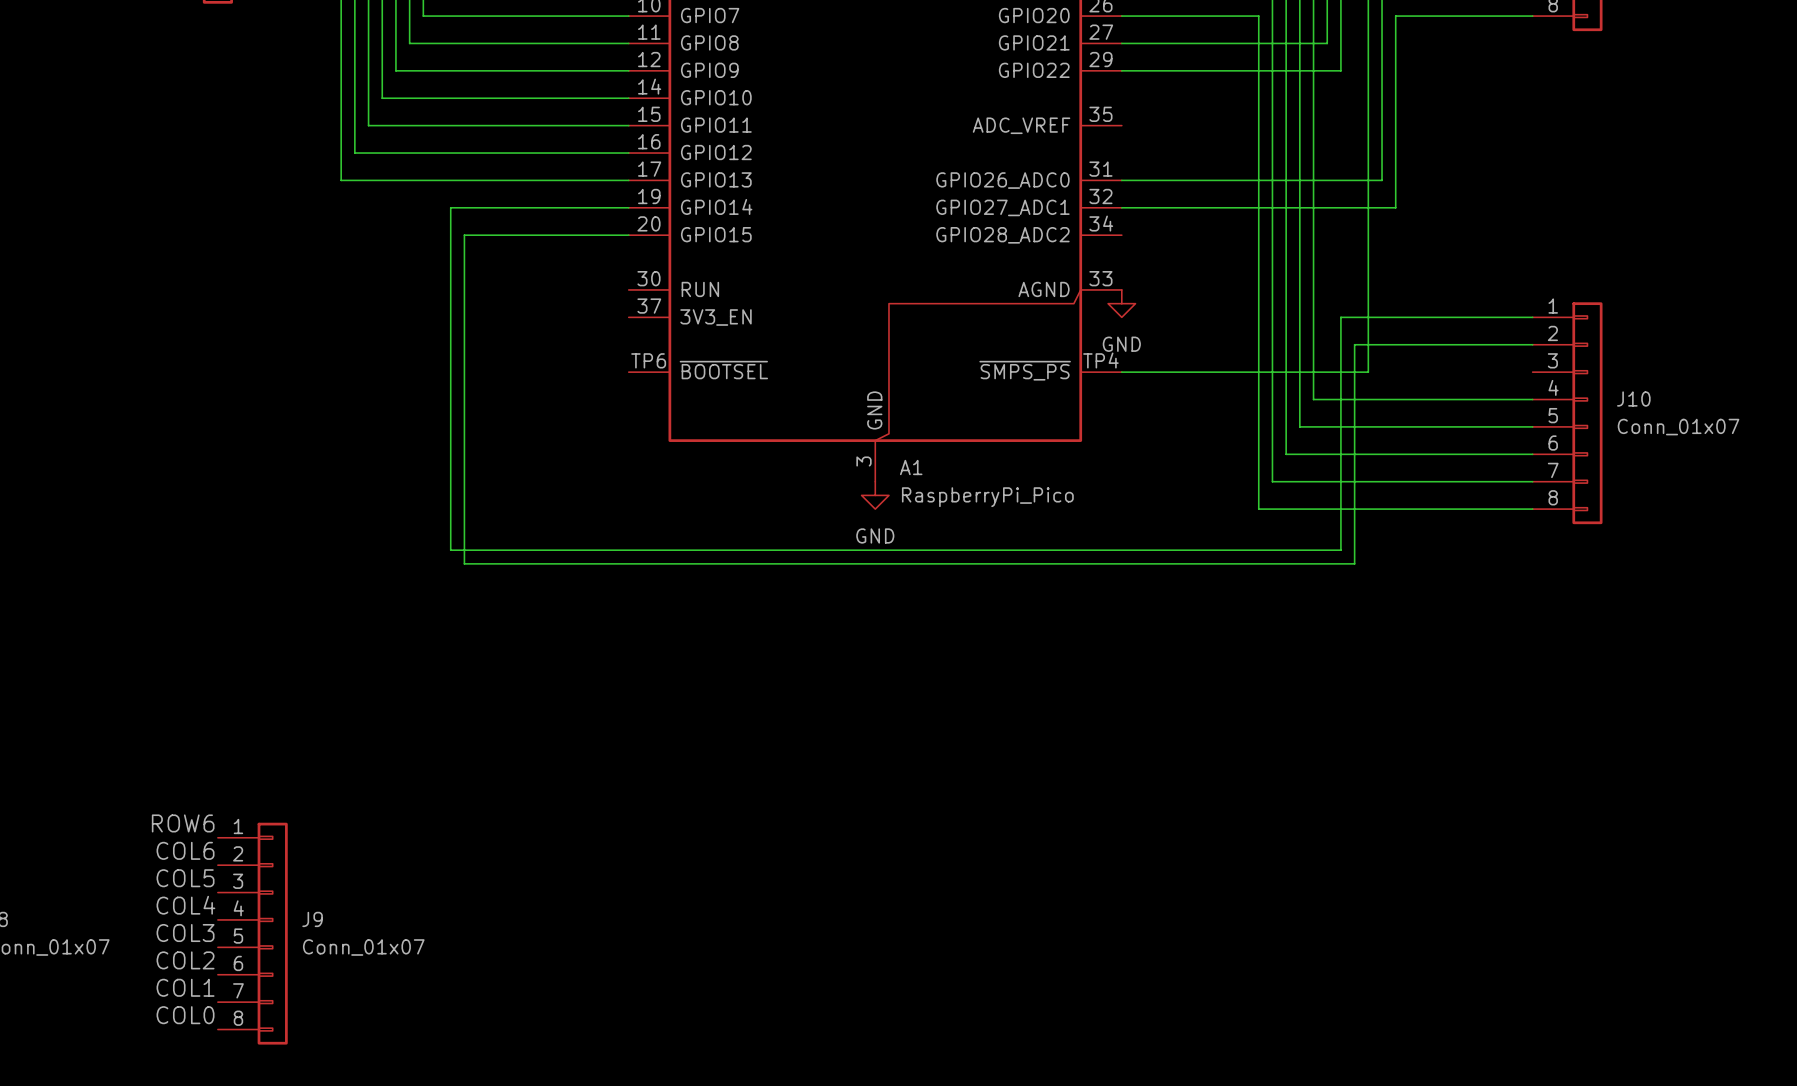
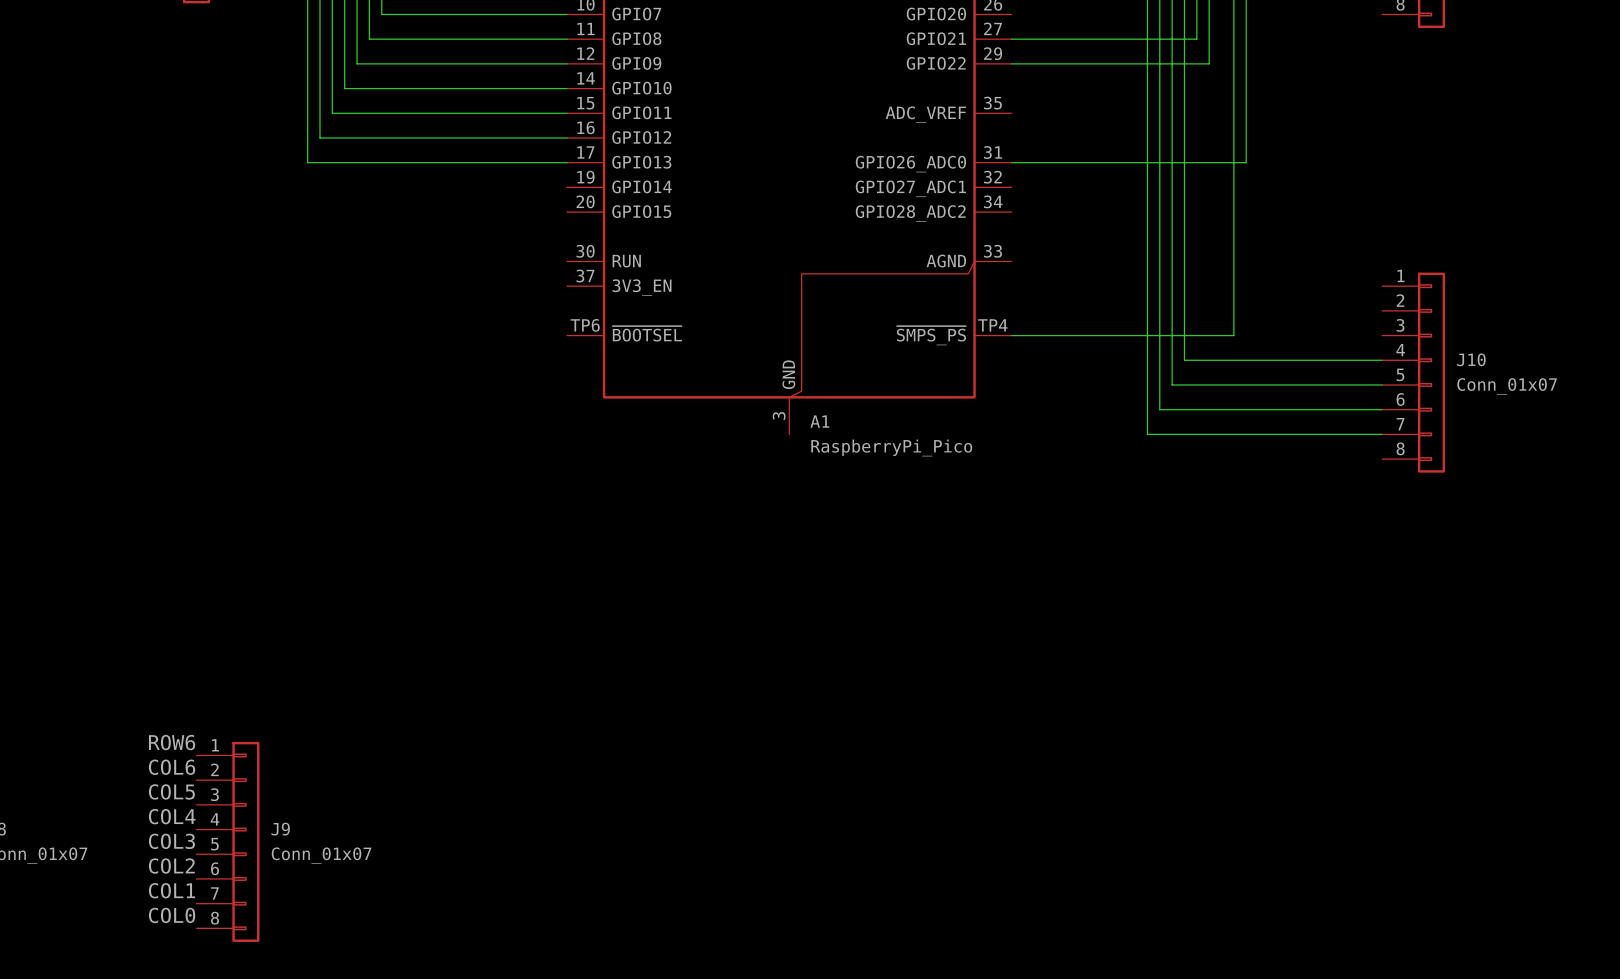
wire: (1121, 16) (1258, 16) (1258, 509) (1532, 509) -> none
wire: (1532, 16) (1395, 16) (1395, 207) (1121, 207) -> none
wire: (628, 207) (450, 207) (450, 550) (1340, 550) (1340, 317) (1532, 317) -> none
wire: (628, 235) (464, 235) (464, 563) (1354, 563) (1354, 344) (1532, 344) -> none
power symbol: GND (1121, 303) -> none
power symbol: GND (875, 495) -> none

